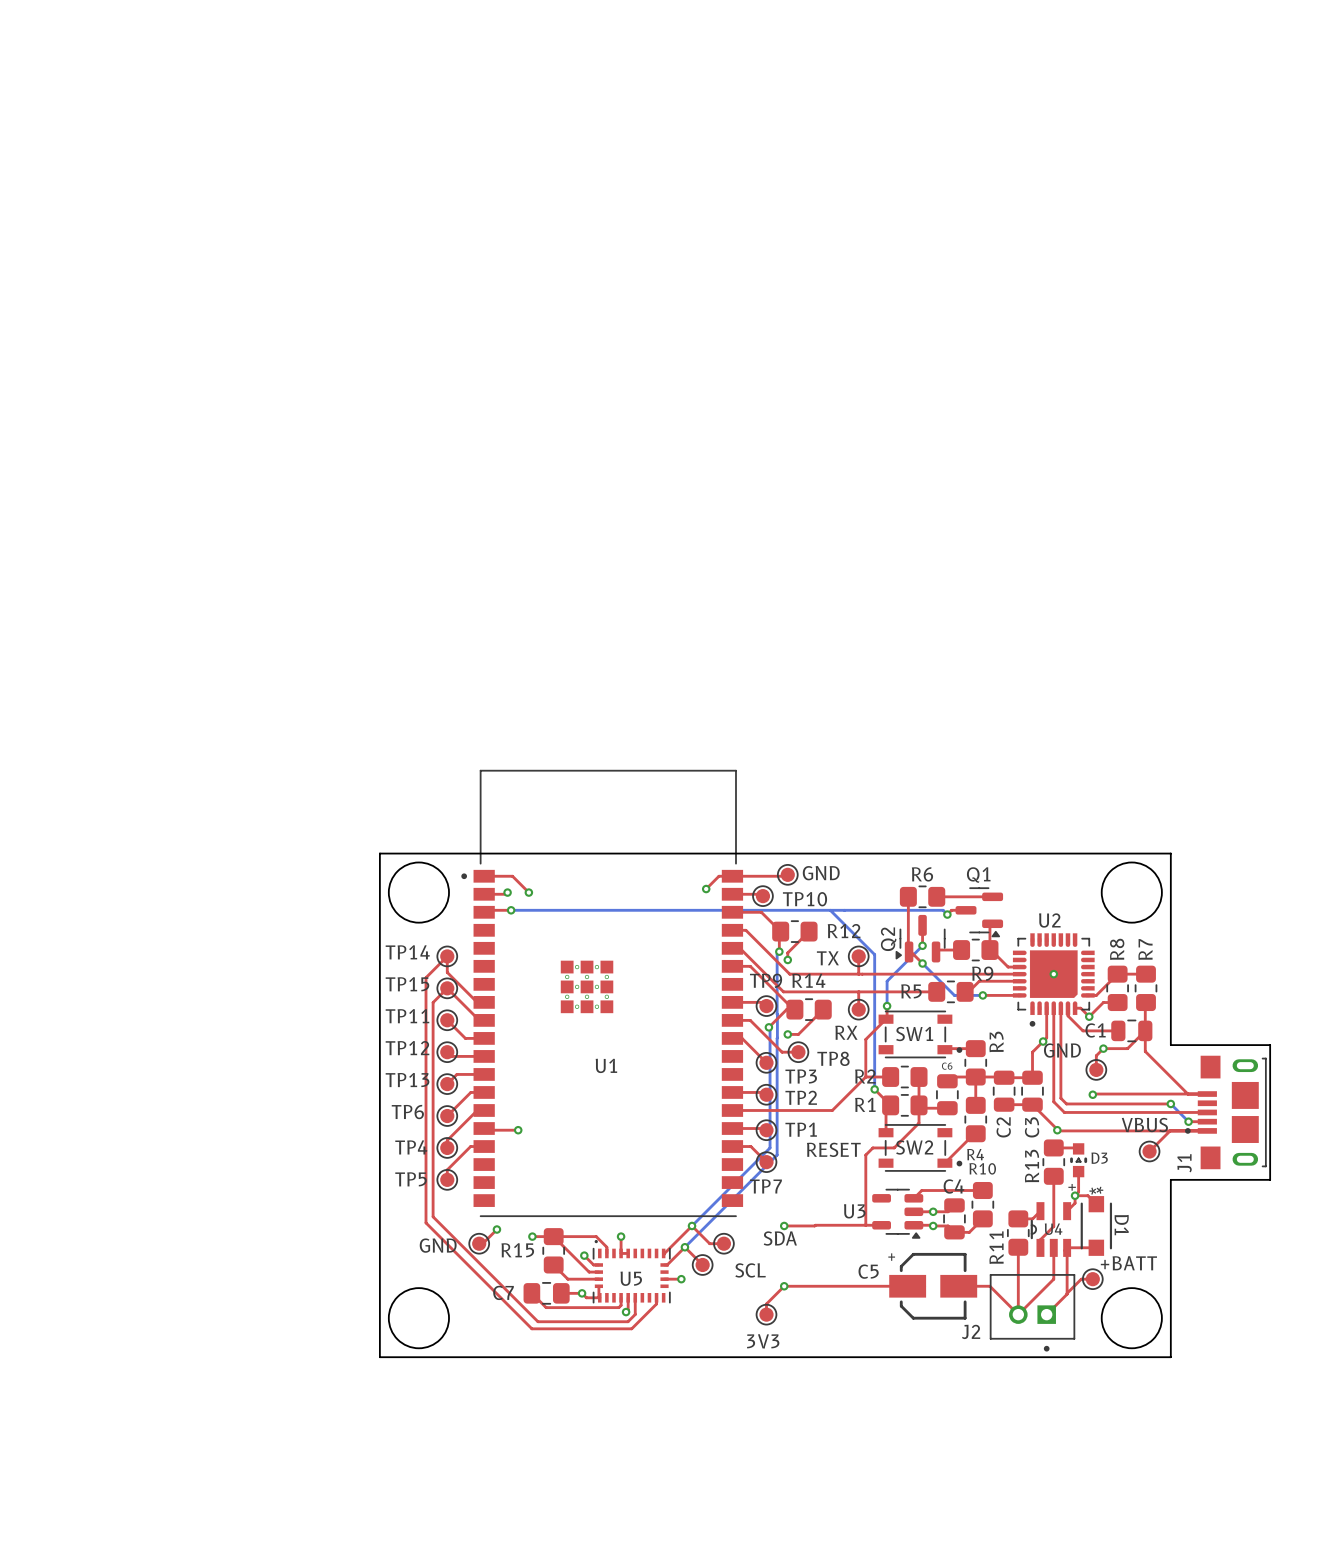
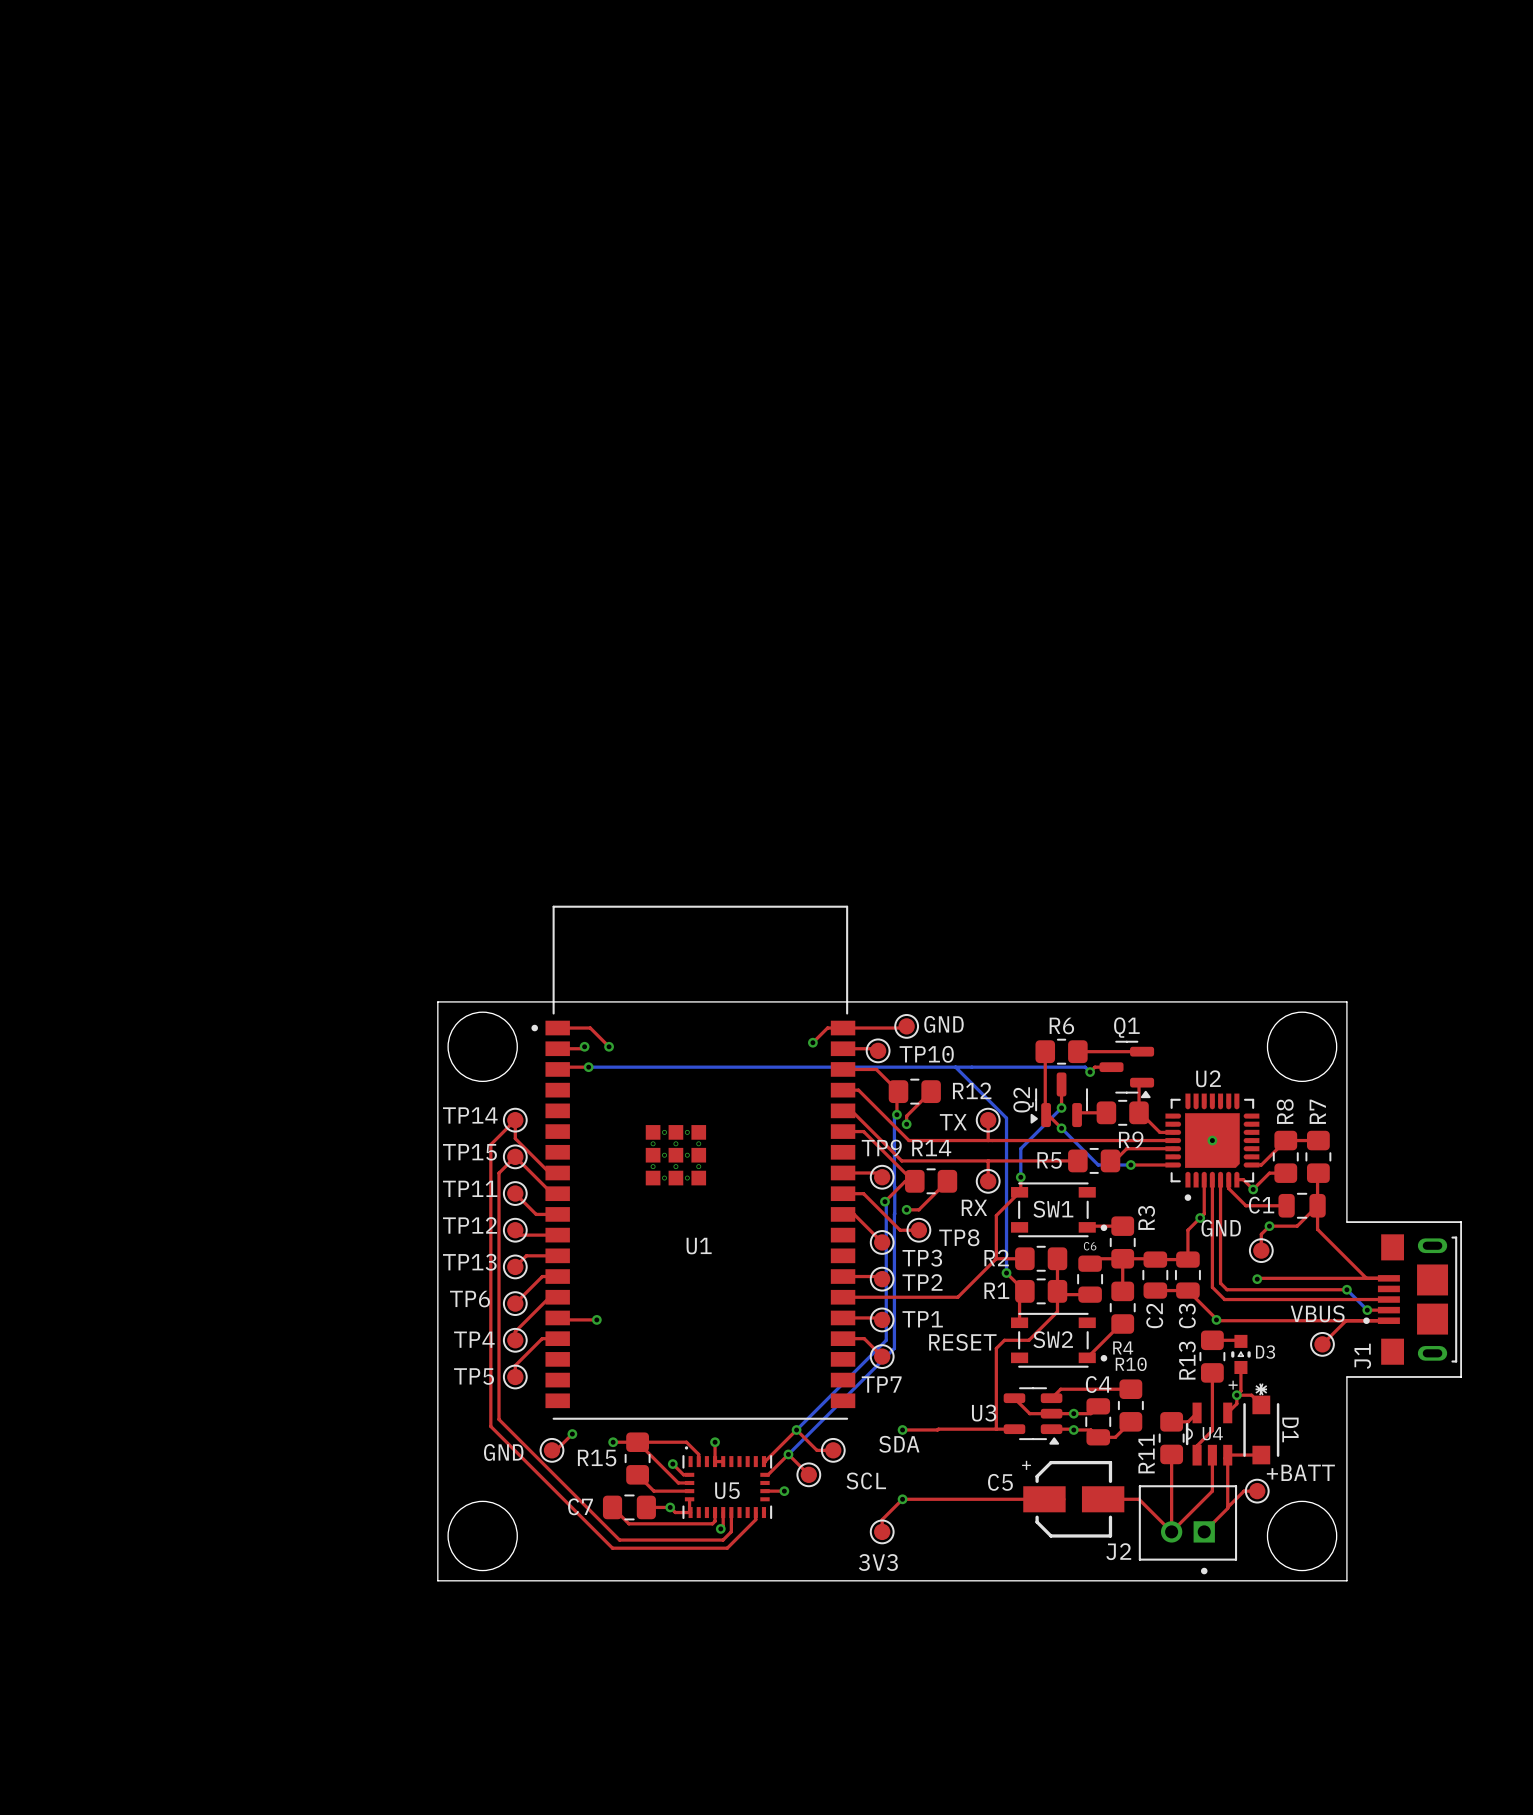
top track: none -> (1014, 1398) (1029, 1413) (1051, 1413)

